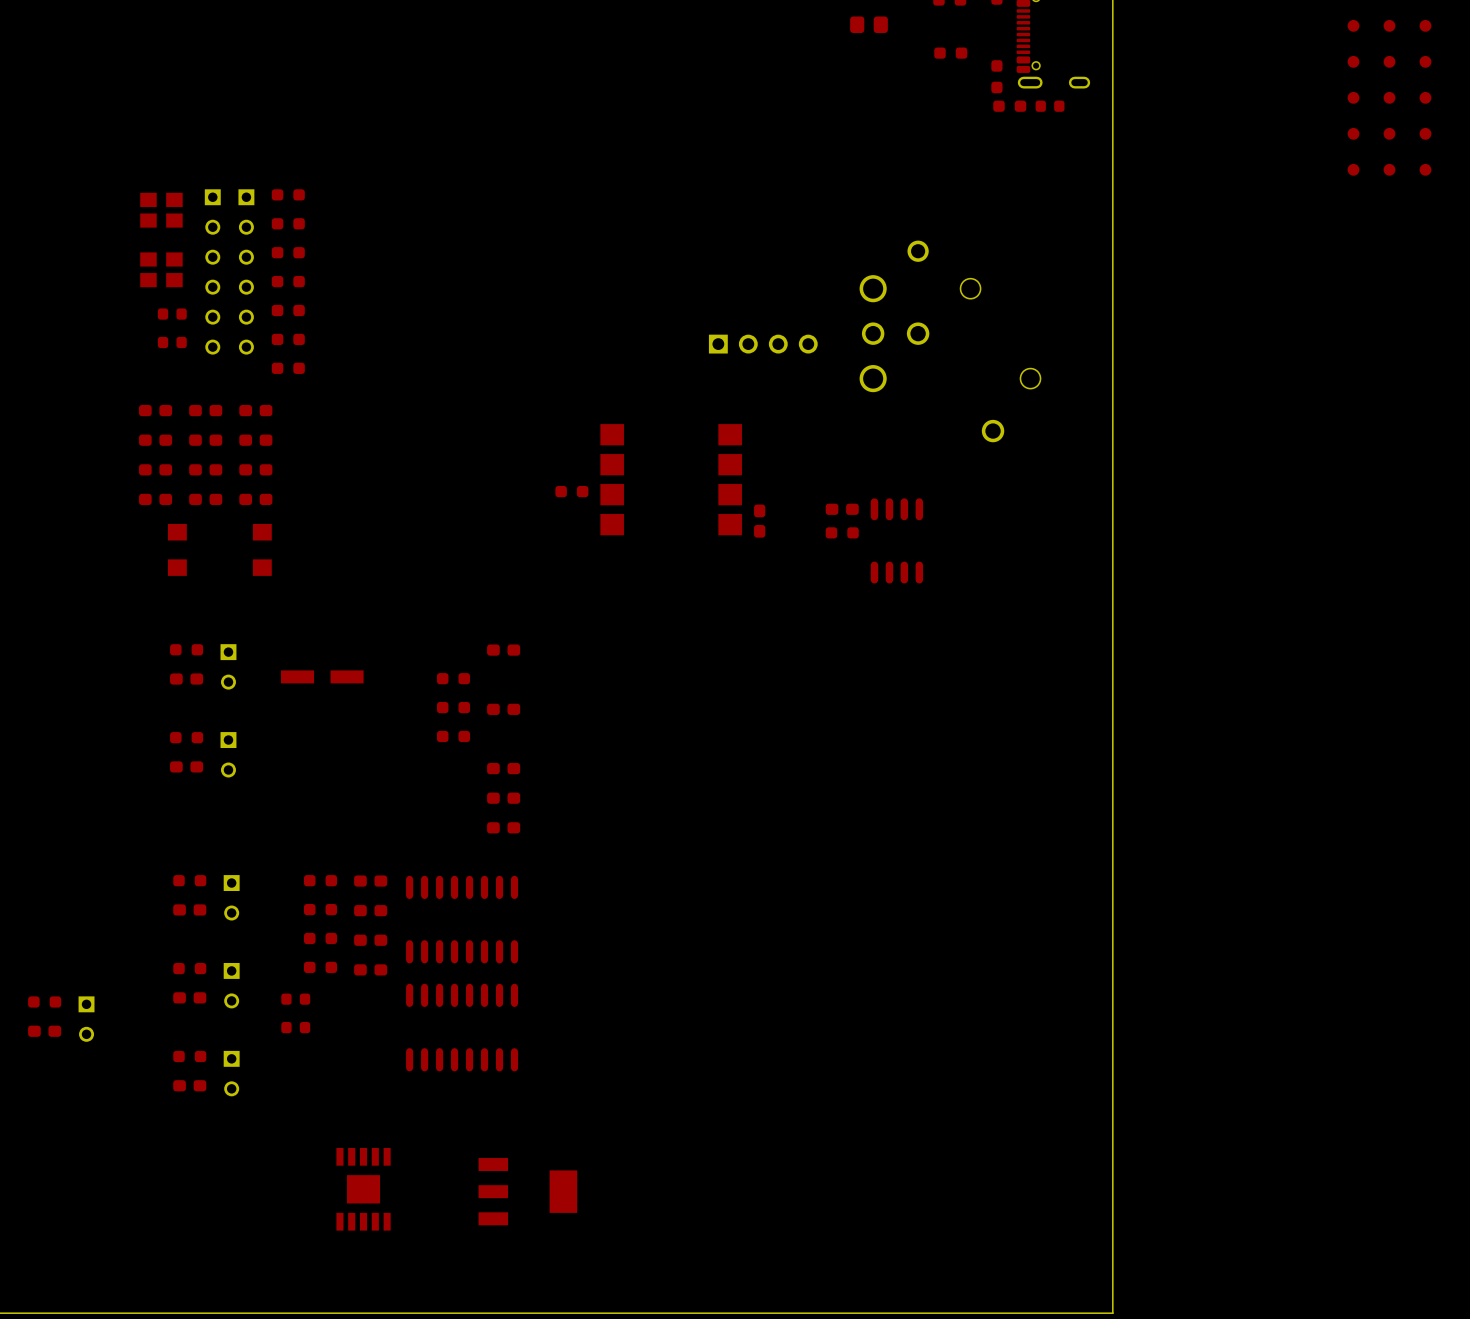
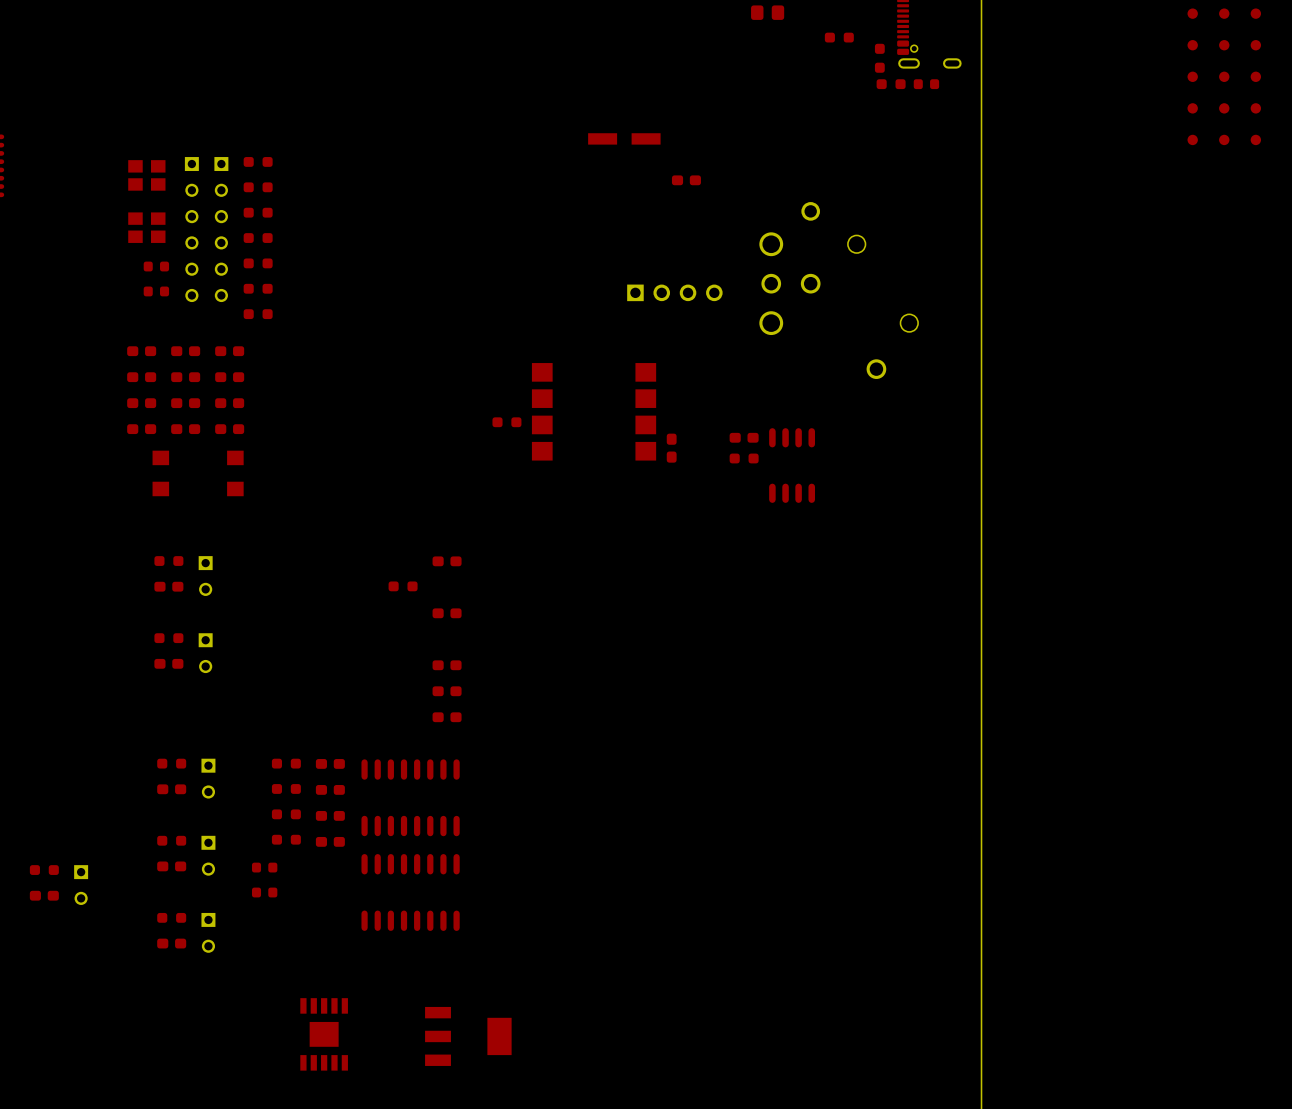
part: none -> (624, 138)
part: none -> (686, 180)
part: (322, 676) -> none
part: (453, 707) -> none
part: (453, 736) -> none

